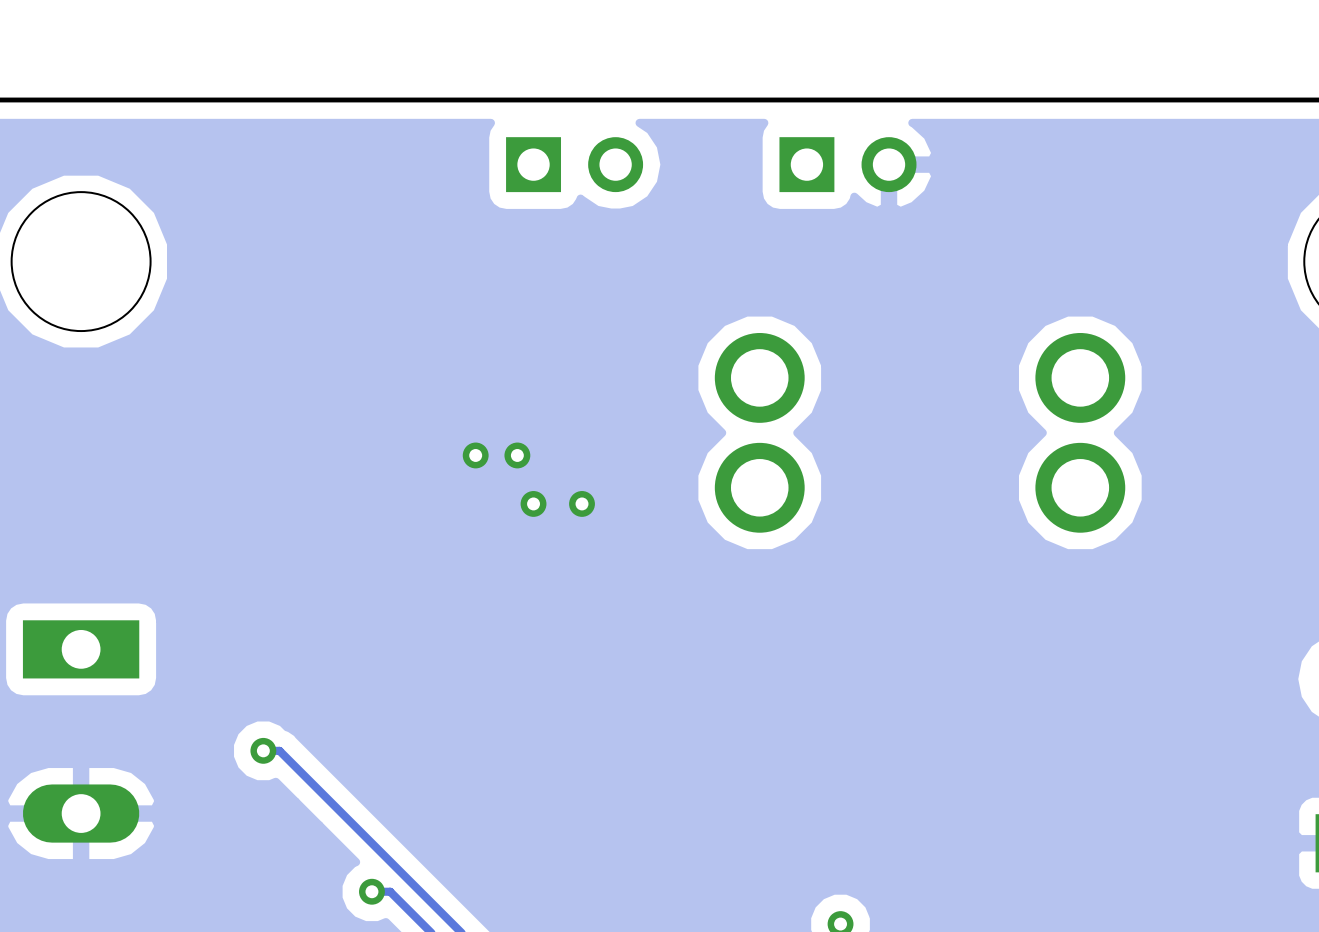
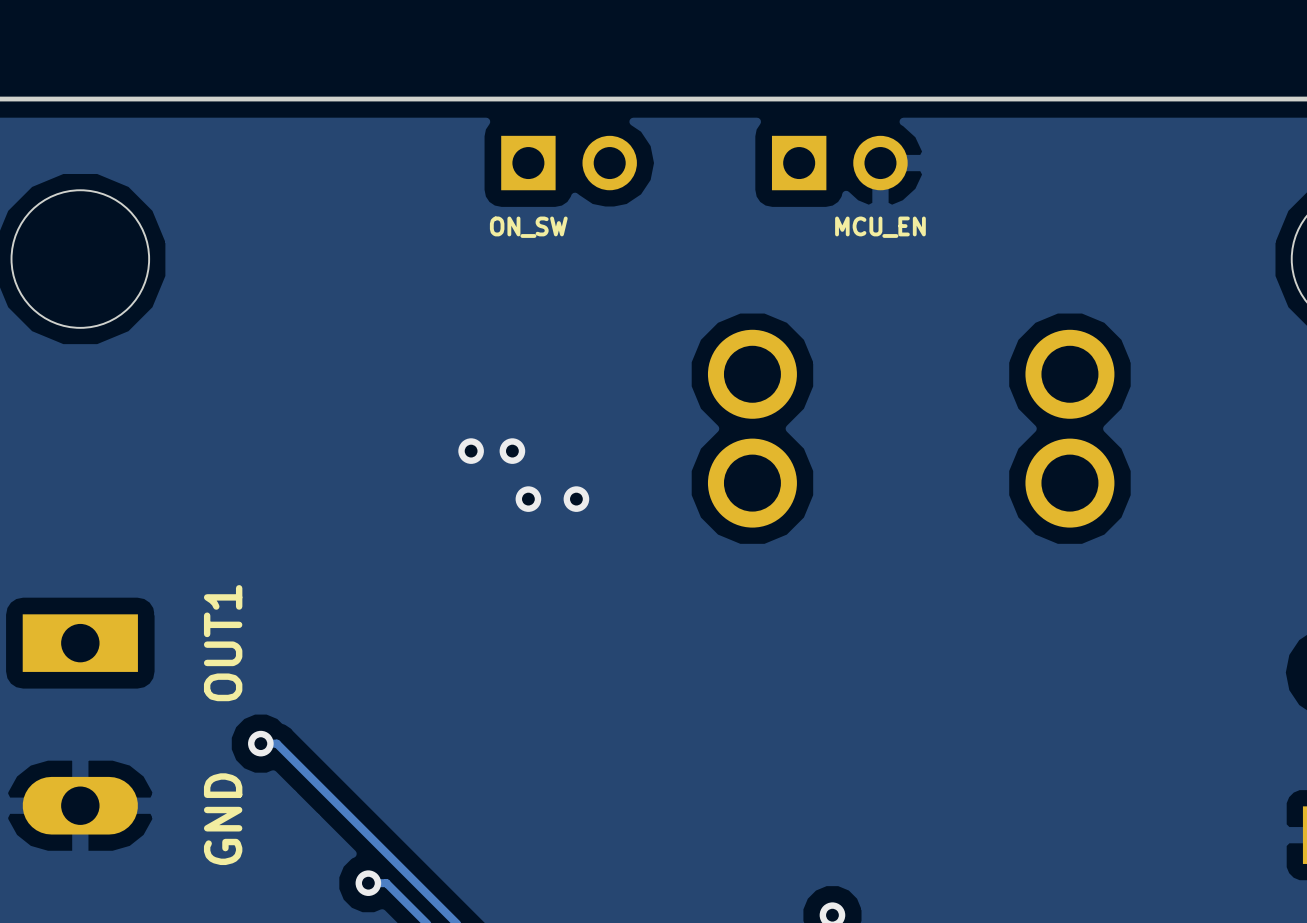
text: none -> ON_SW (528, 227)
text: none -> MCU_EN (880, 227)
text: none -> OUT1 (223, 643)
text: none -> GND (223, 819)

